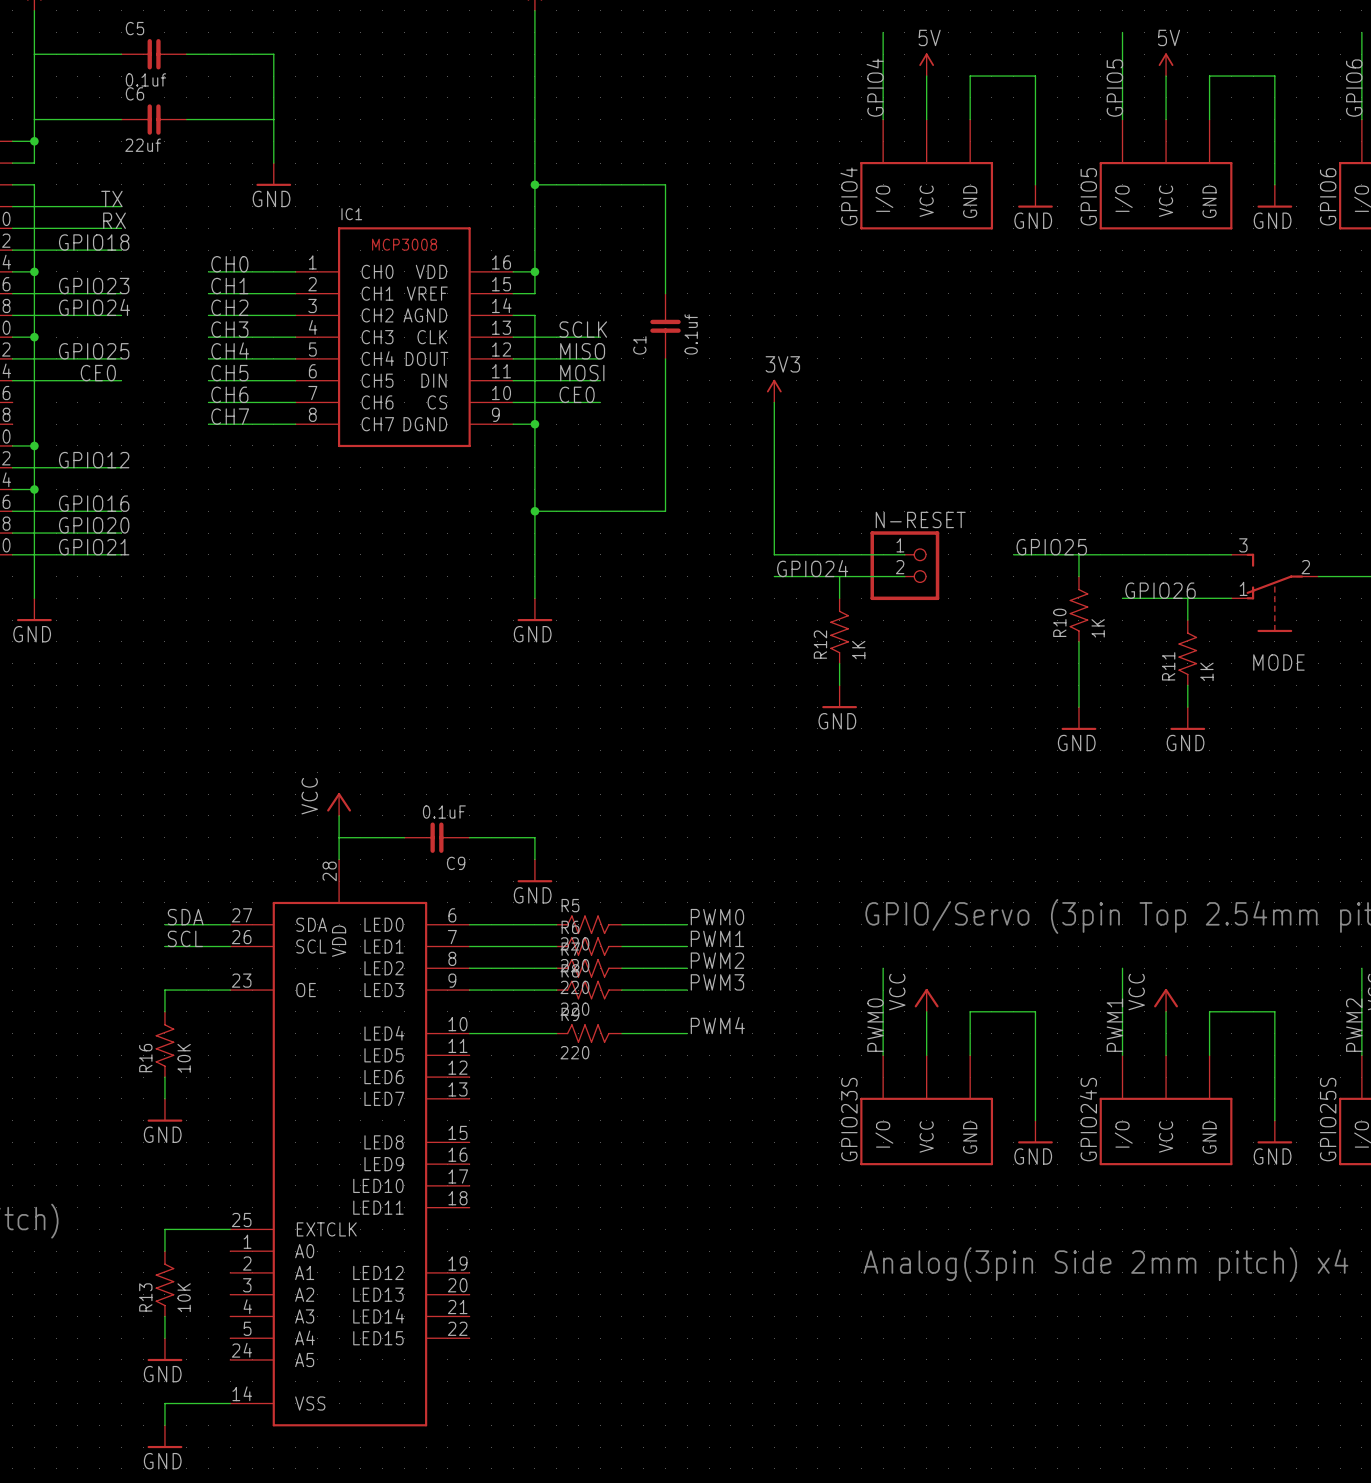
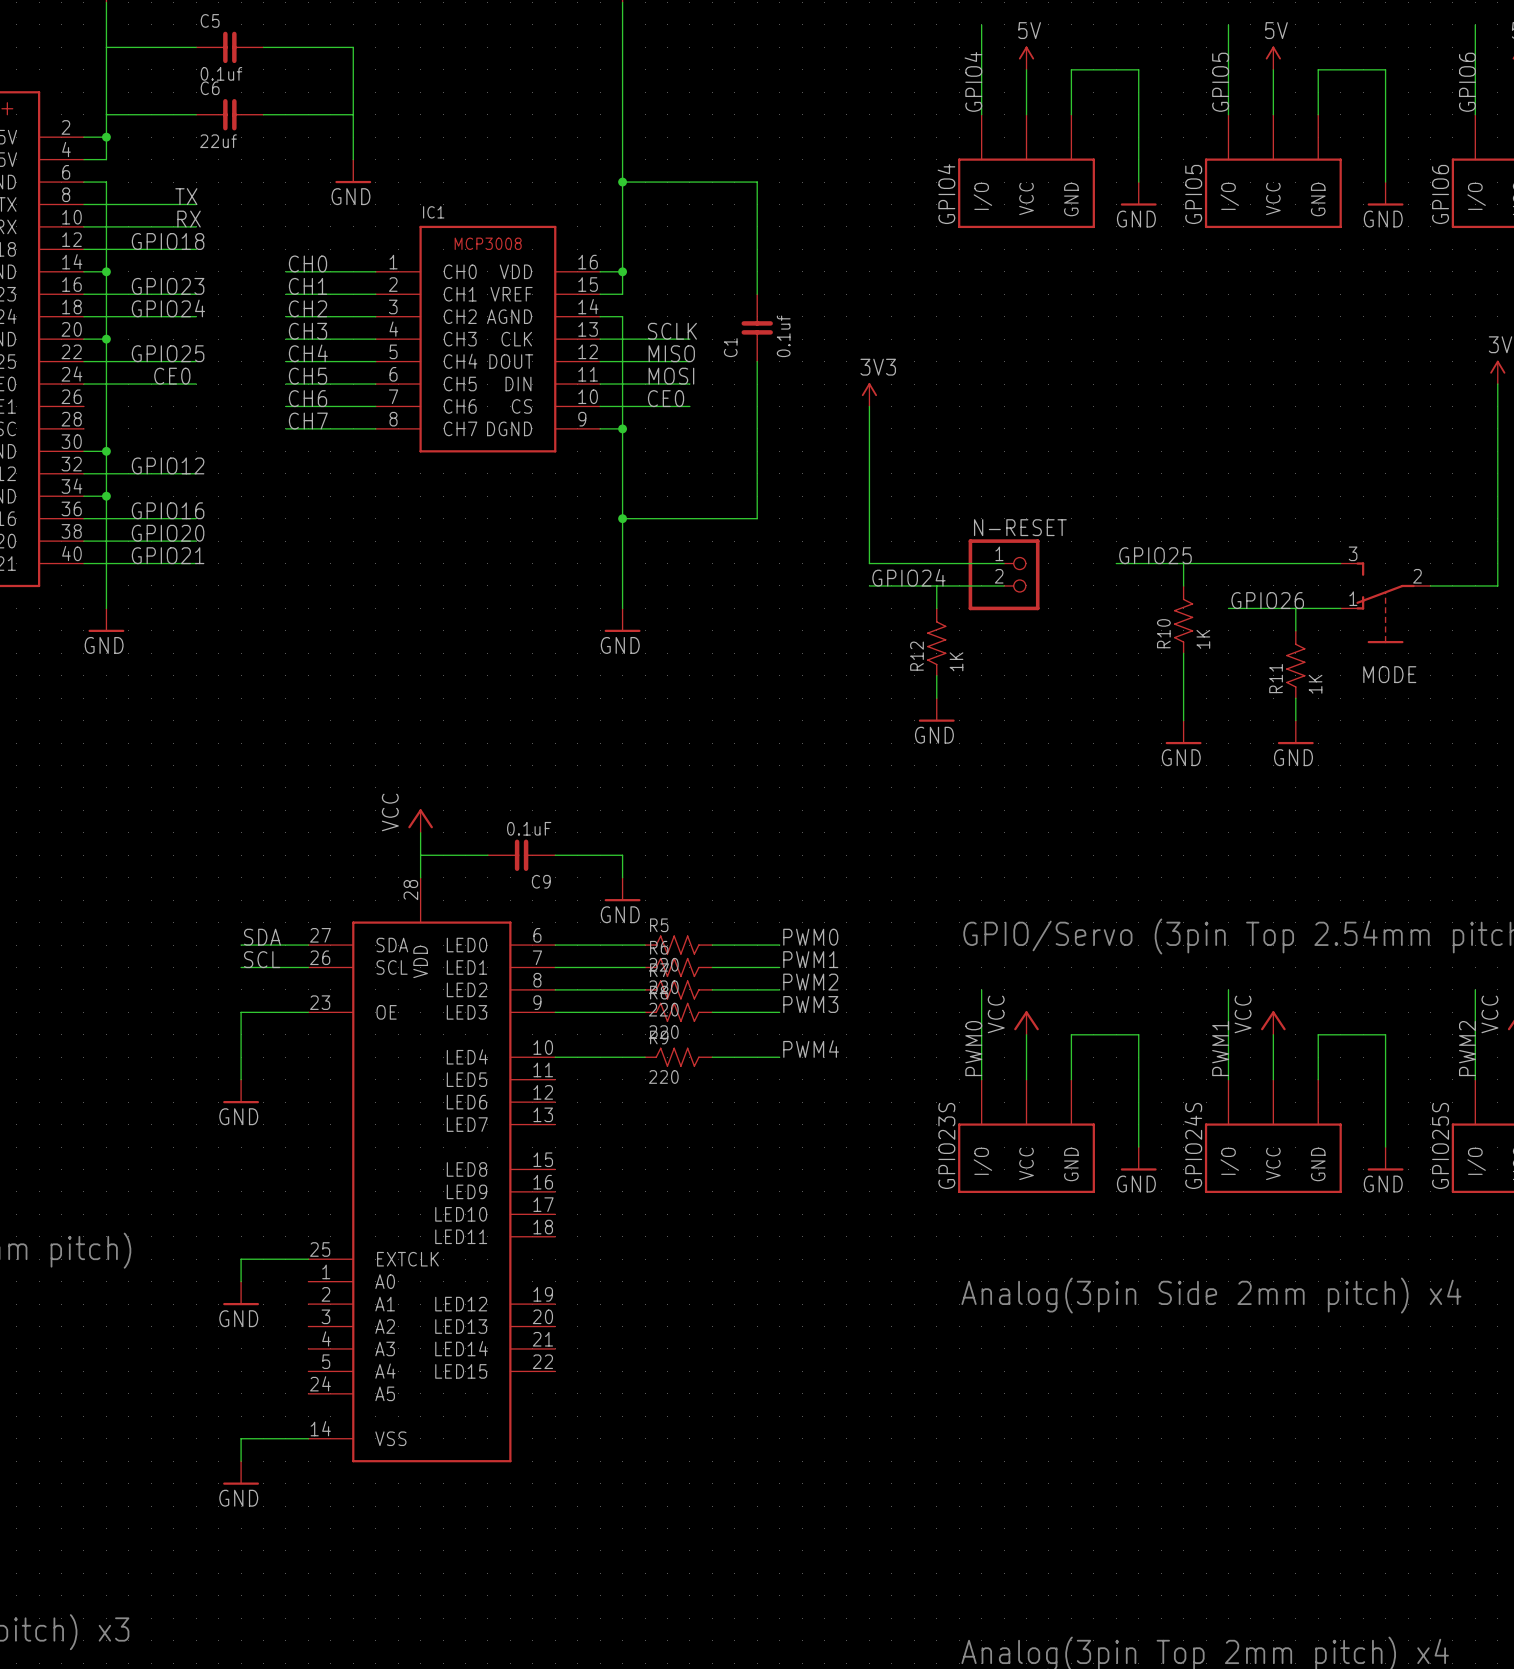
wire: none -> (241, 1034) (241, 1079)
R16: 10K (164, 1044) -> none
wire: (164, 1077) (164, 1098) -> none
power symbol position: GND (164, 1110) -> GND (241, 1091)
power symbol: none -> GND (241, 1293)
R13: 10K (164, 1283) -> none
wire: (164, 1316) (164, 1338) -> none
power symbol: GND (164, 1349) -> none

